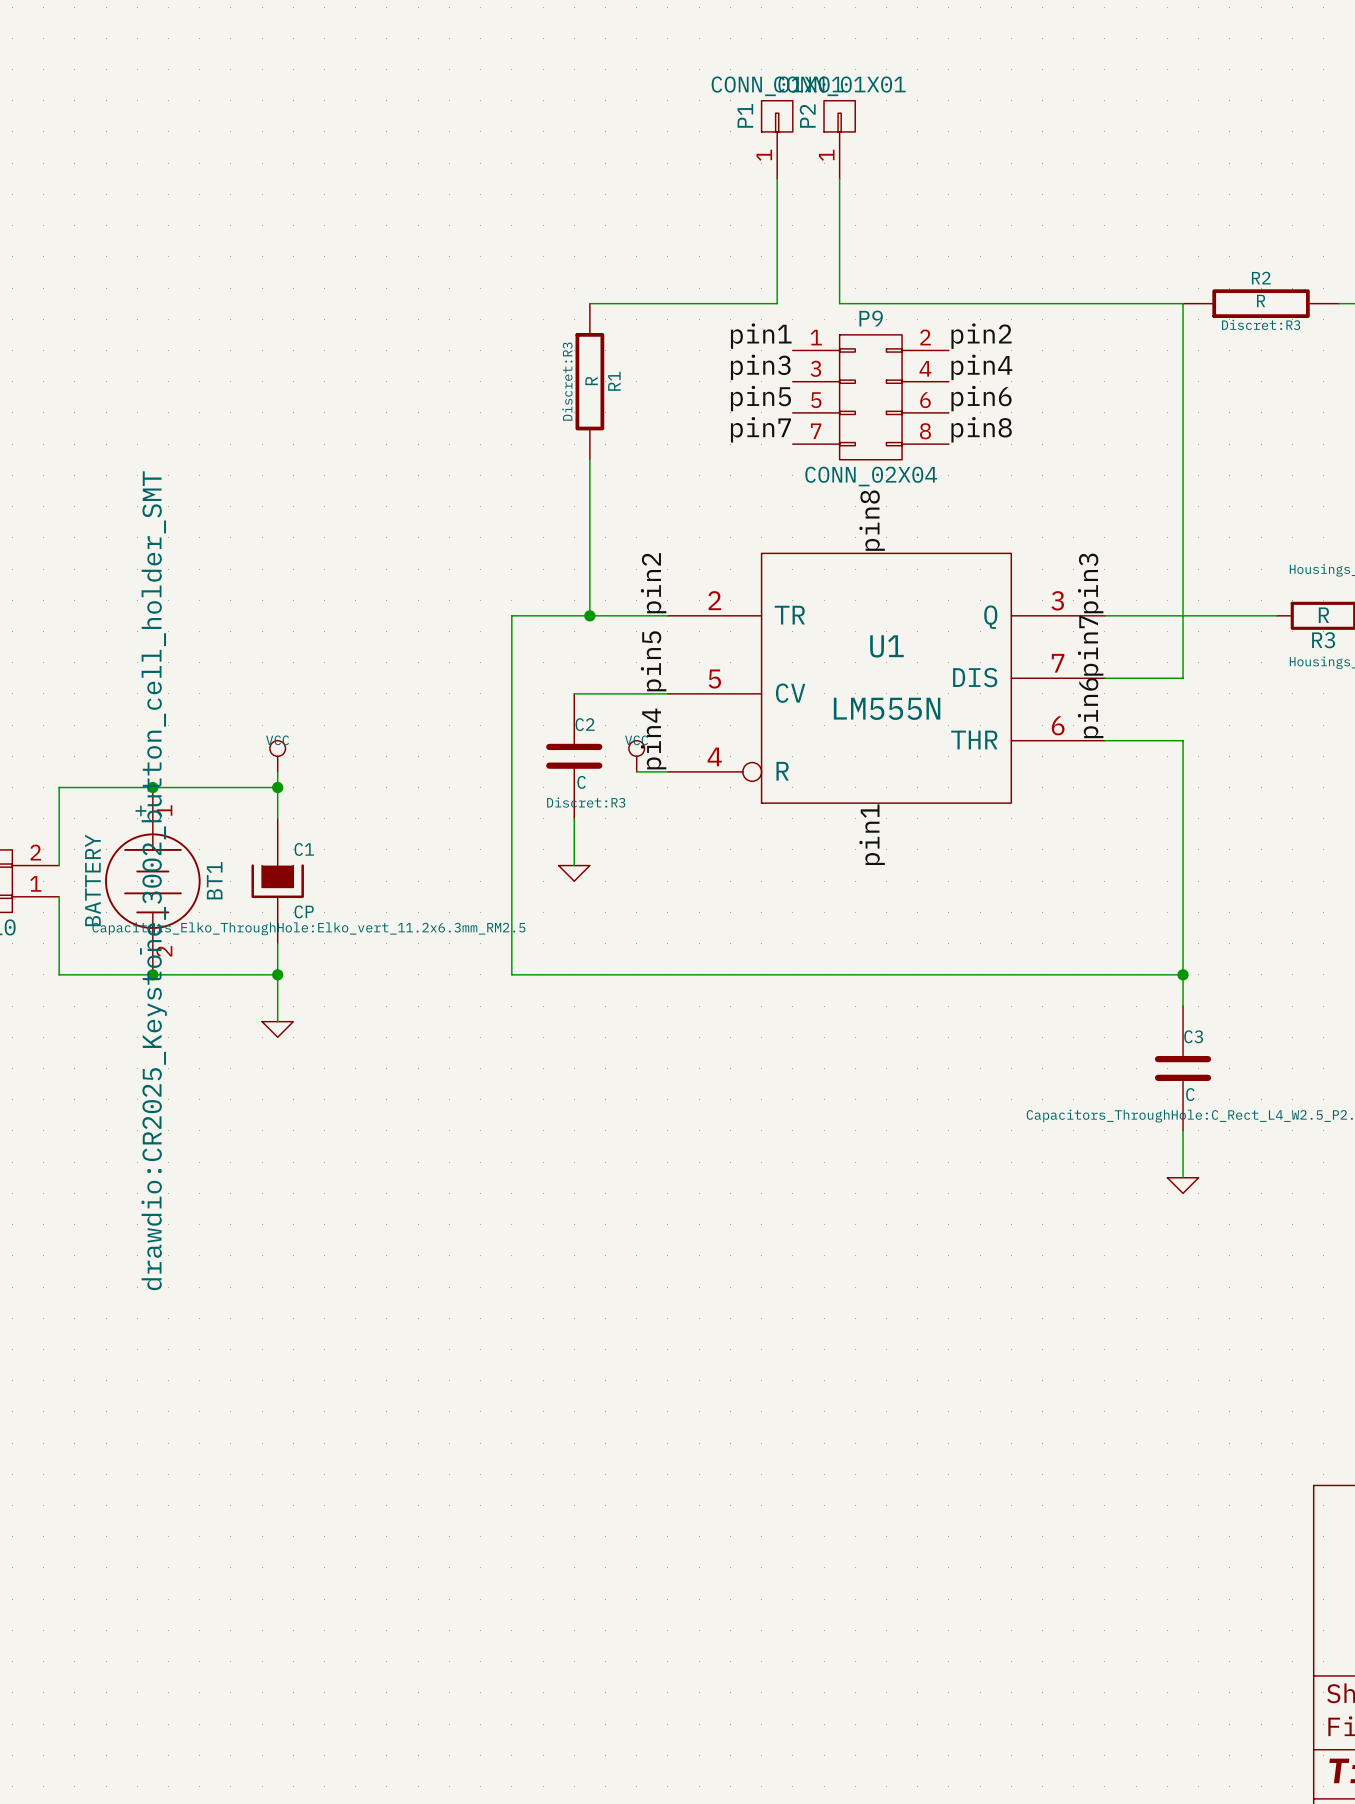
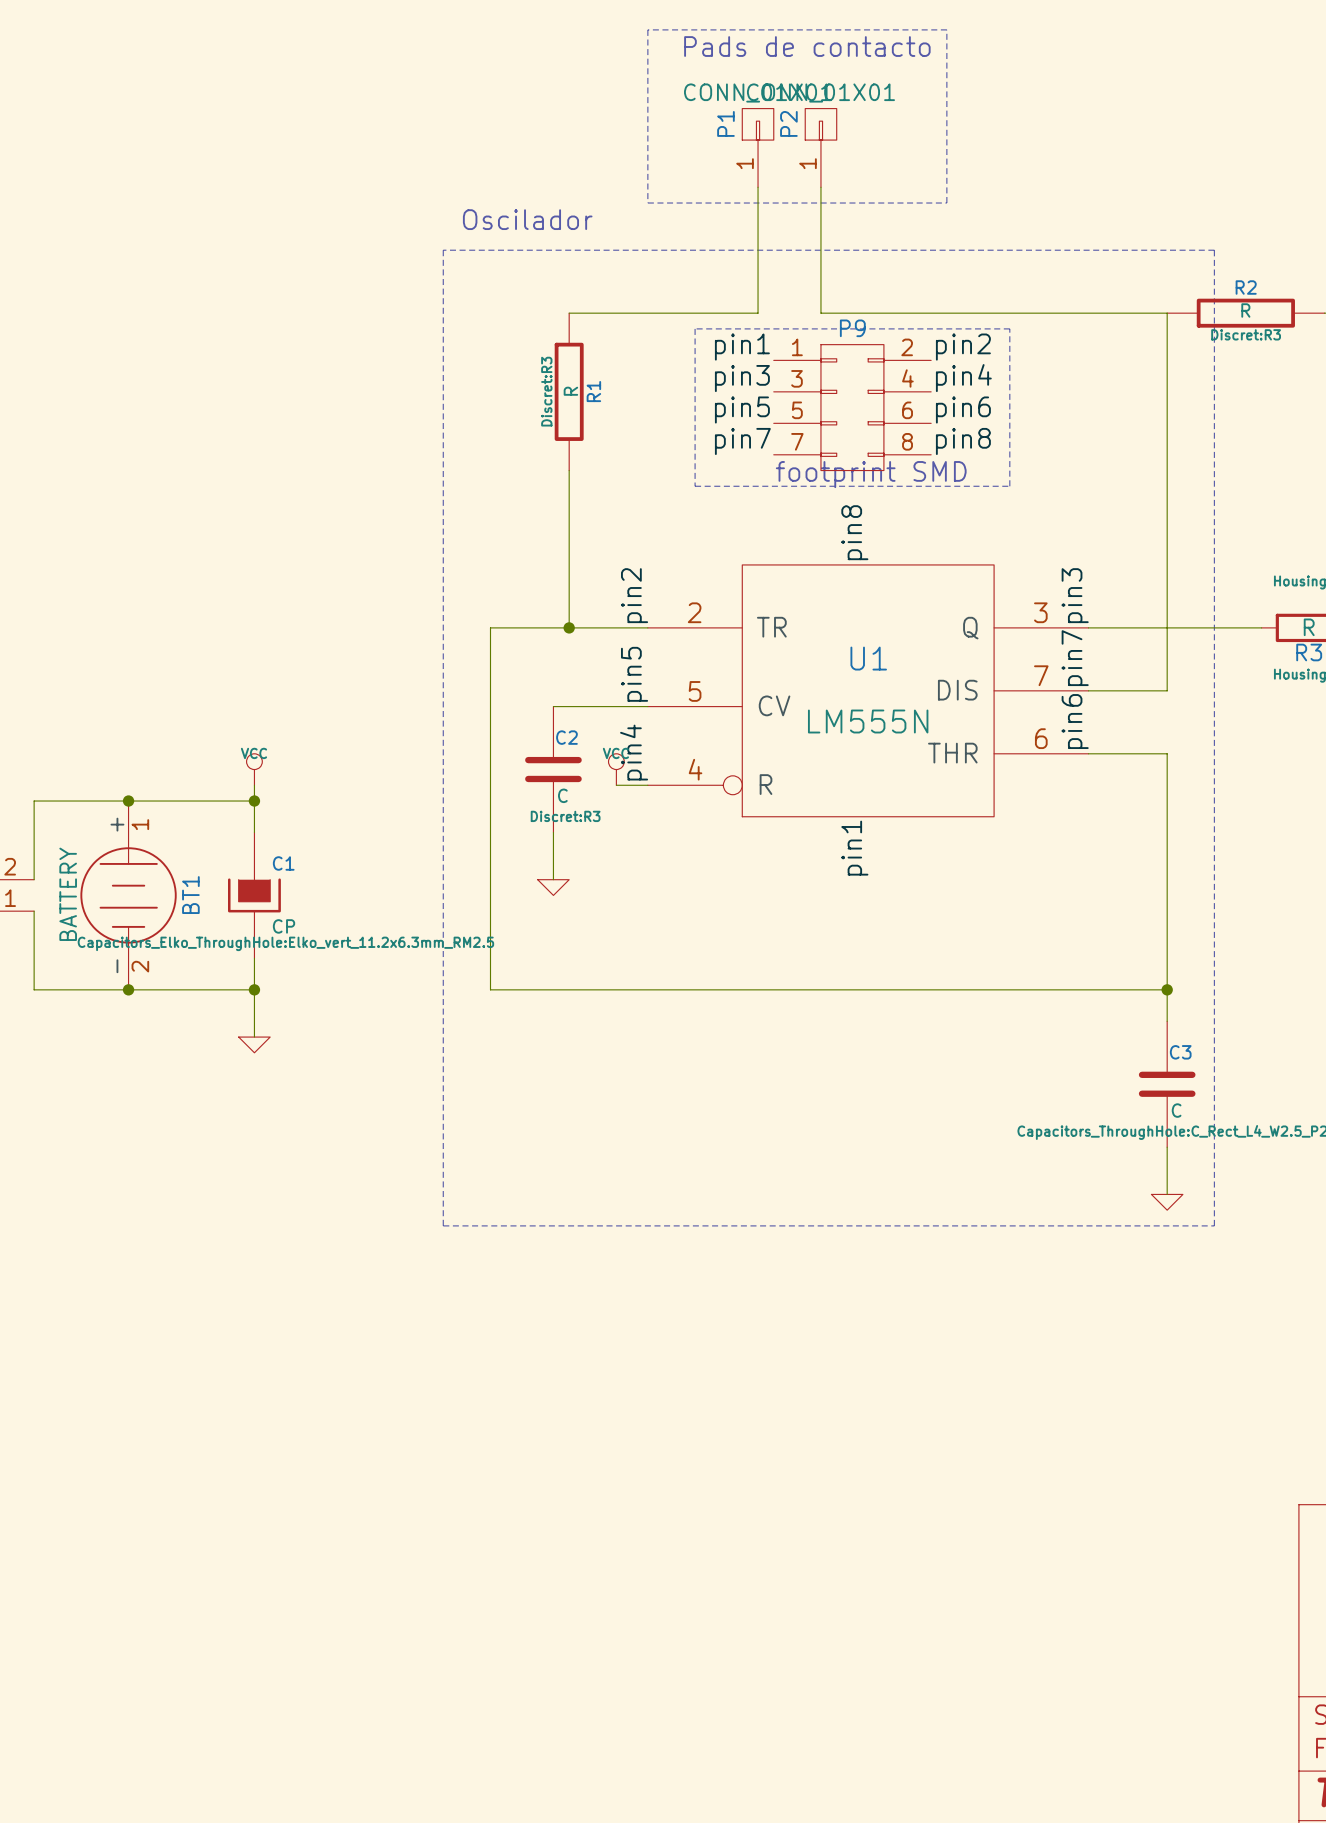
line: none -> (647, 29) (647, 203) (946, 203) (946, 29) (647, 29)
text: none -> Pads de contacto (807, 46)
text: none -> Oscilador (527, 219)
line: none -> (443, 250) (443, 1225) (1214, 1225) (1214, 250) (443, 250)
line: none -> (695, 328) (695, 486) (1009, 486) (1009, 328) (695, 328)
text: none -> footprint SMD (871, 474)
P9 value: CONN_02X04 (871, 476) -> none
BT1 text: drawdio:CR2025_Keystone_3002_button_cell_holder_SMT (154, 880) -> none

